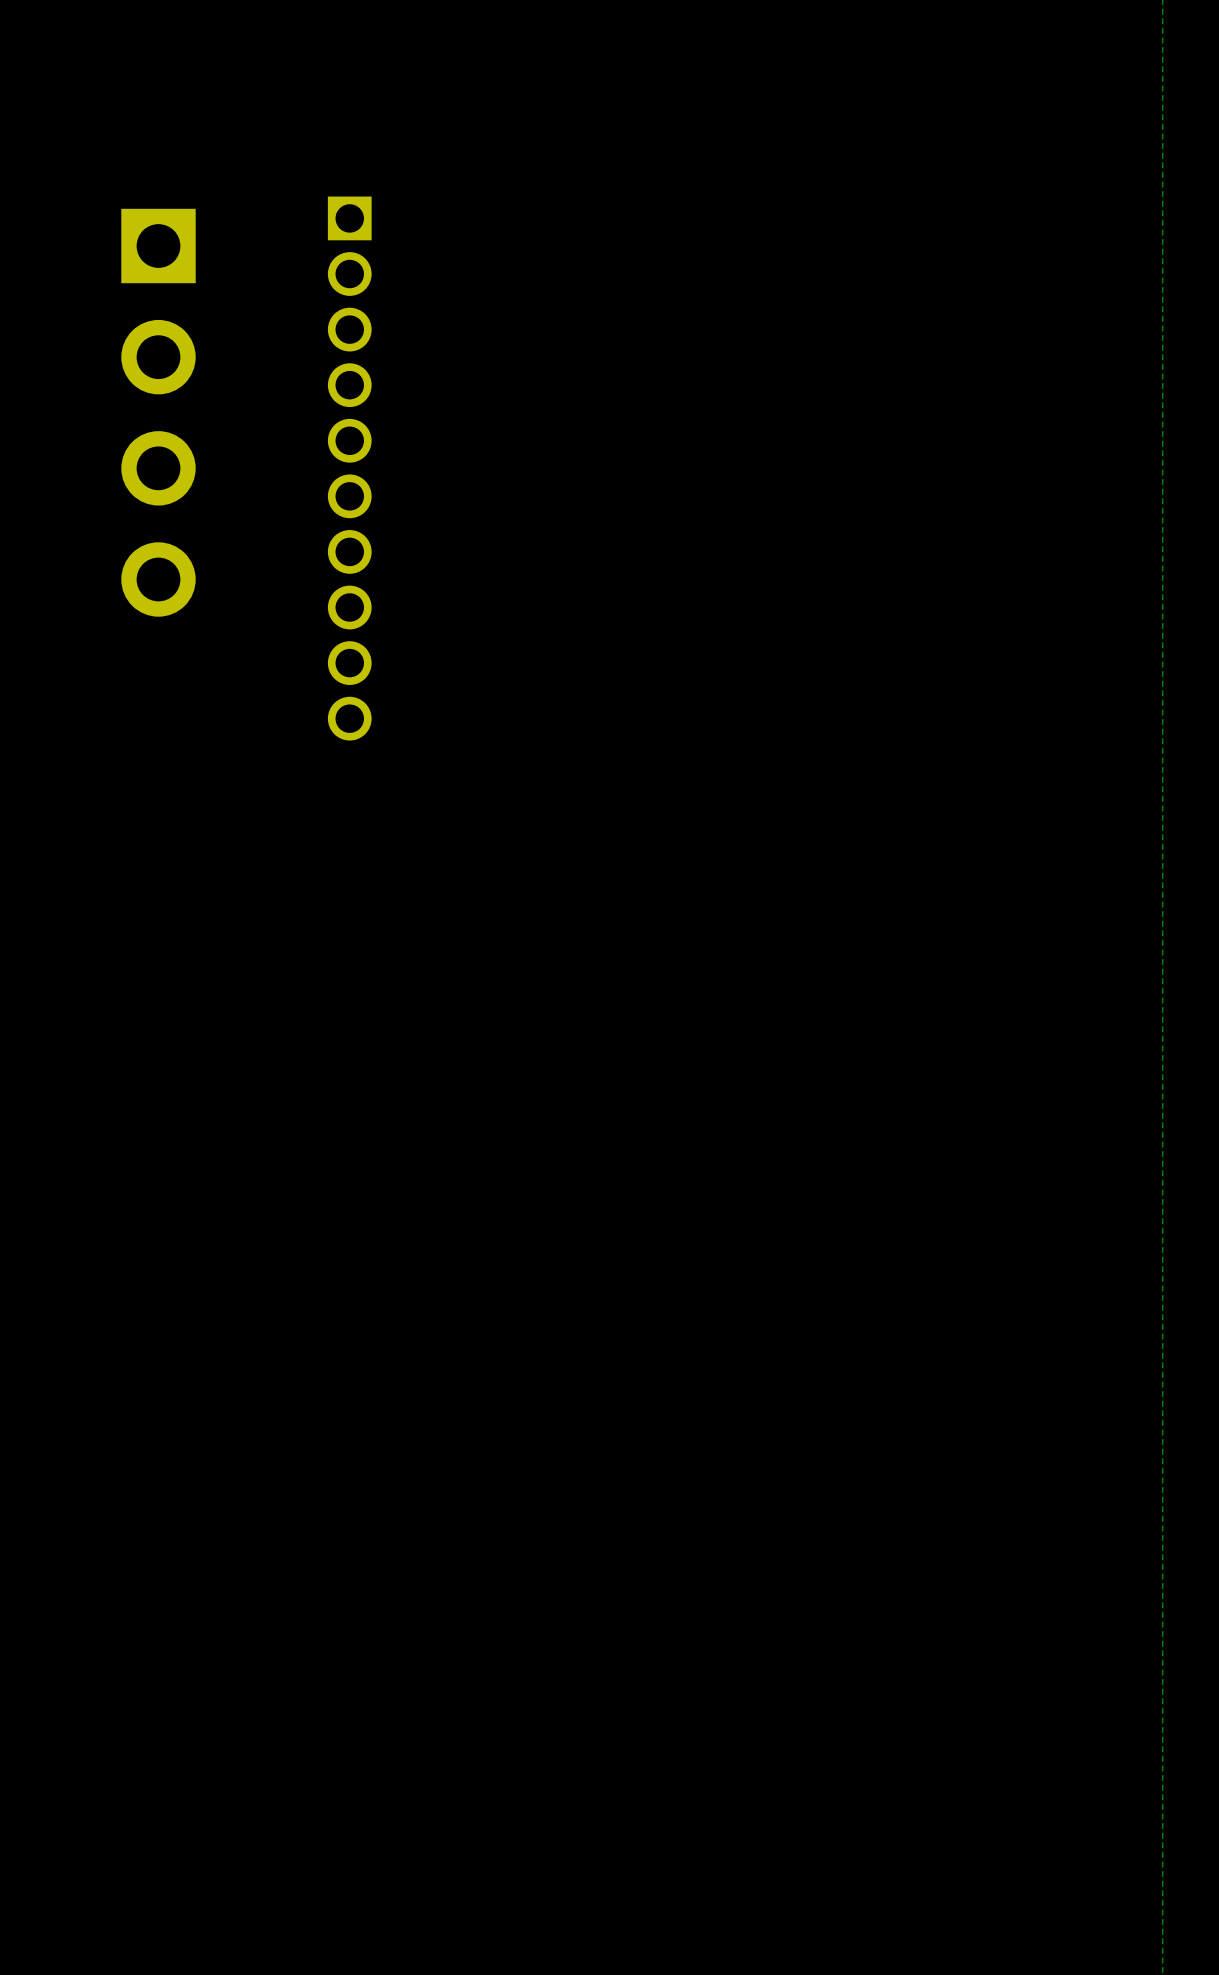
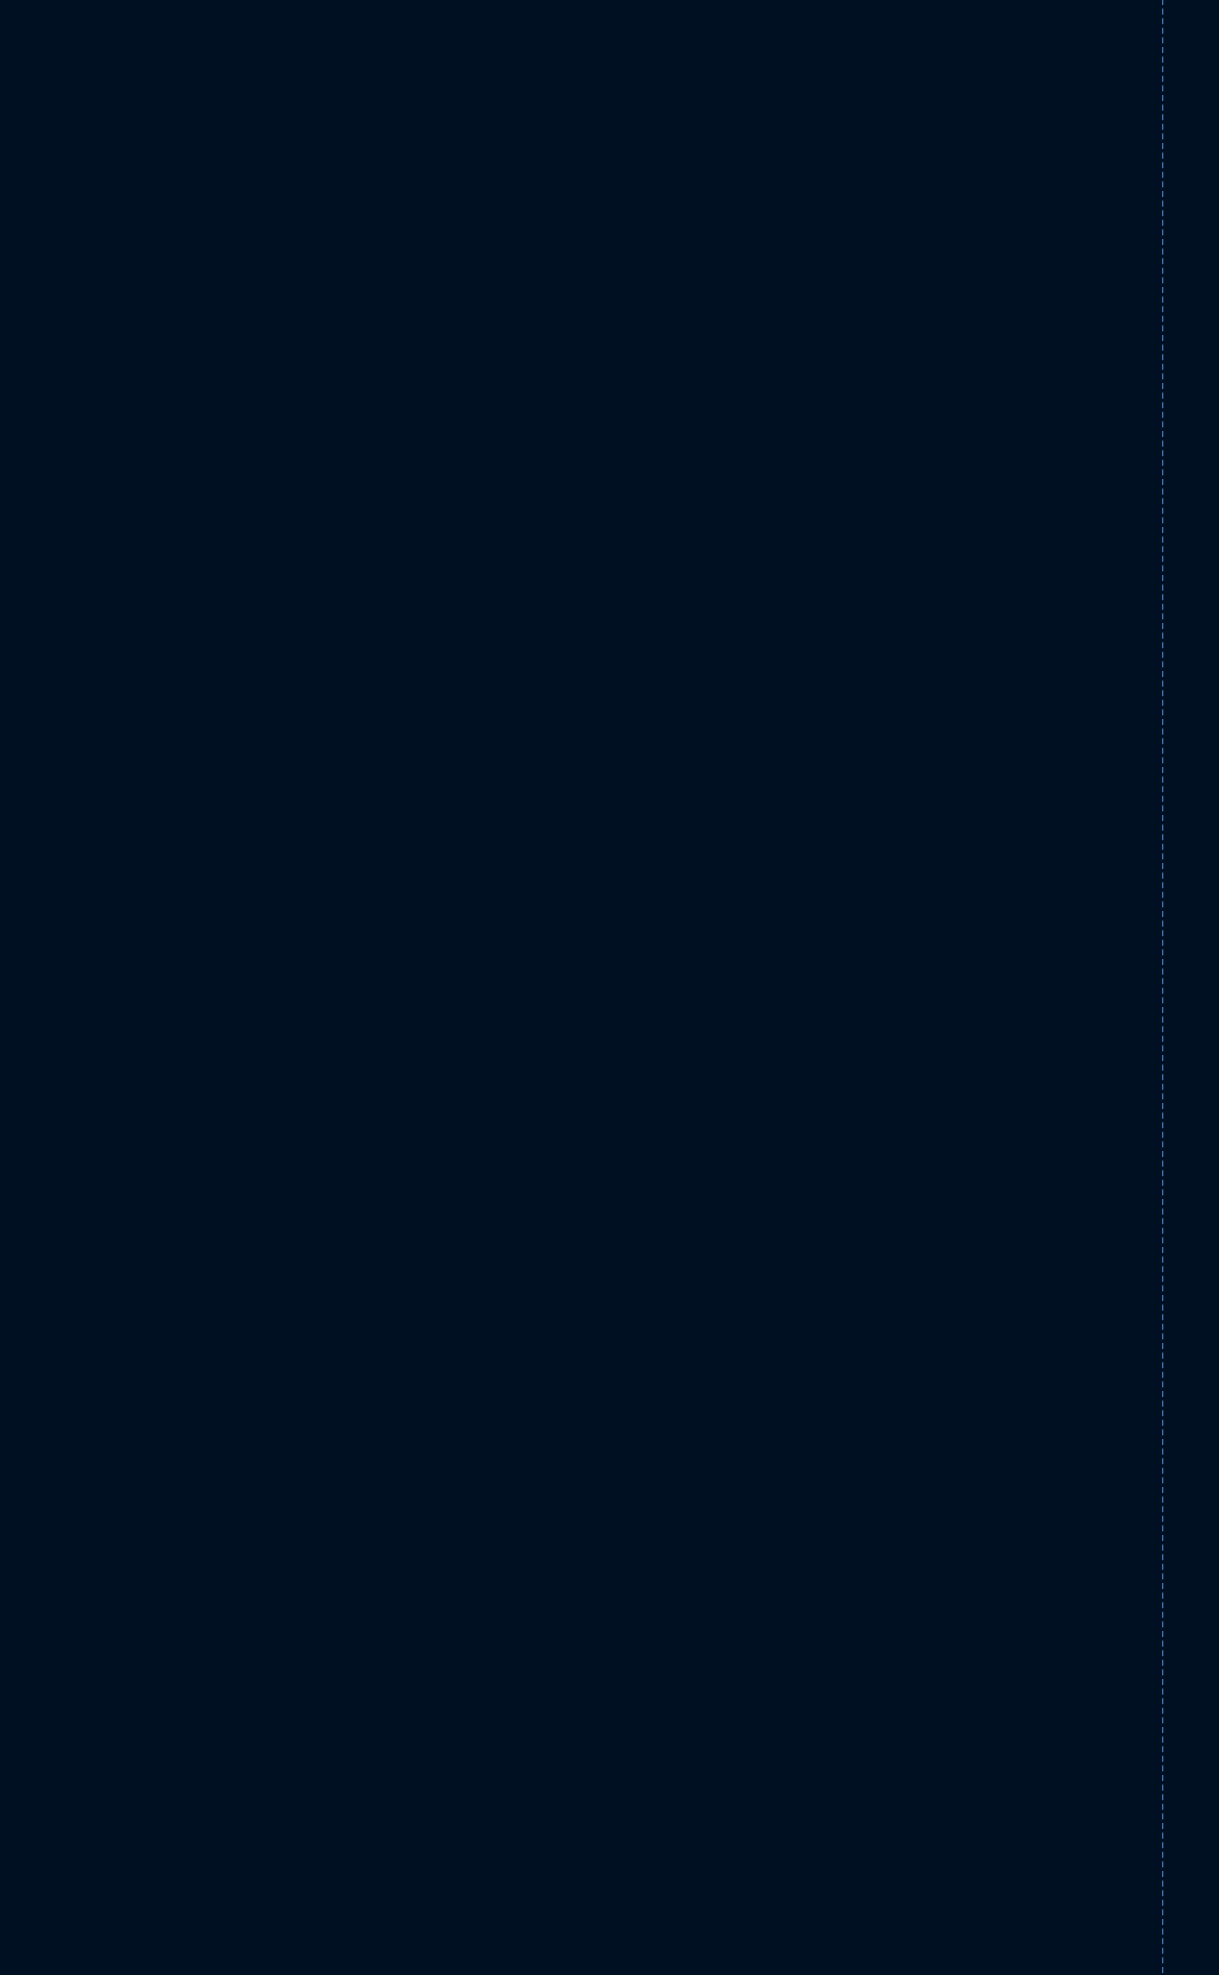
part: (158, 412) -> none
part: (349, 468) -> none

